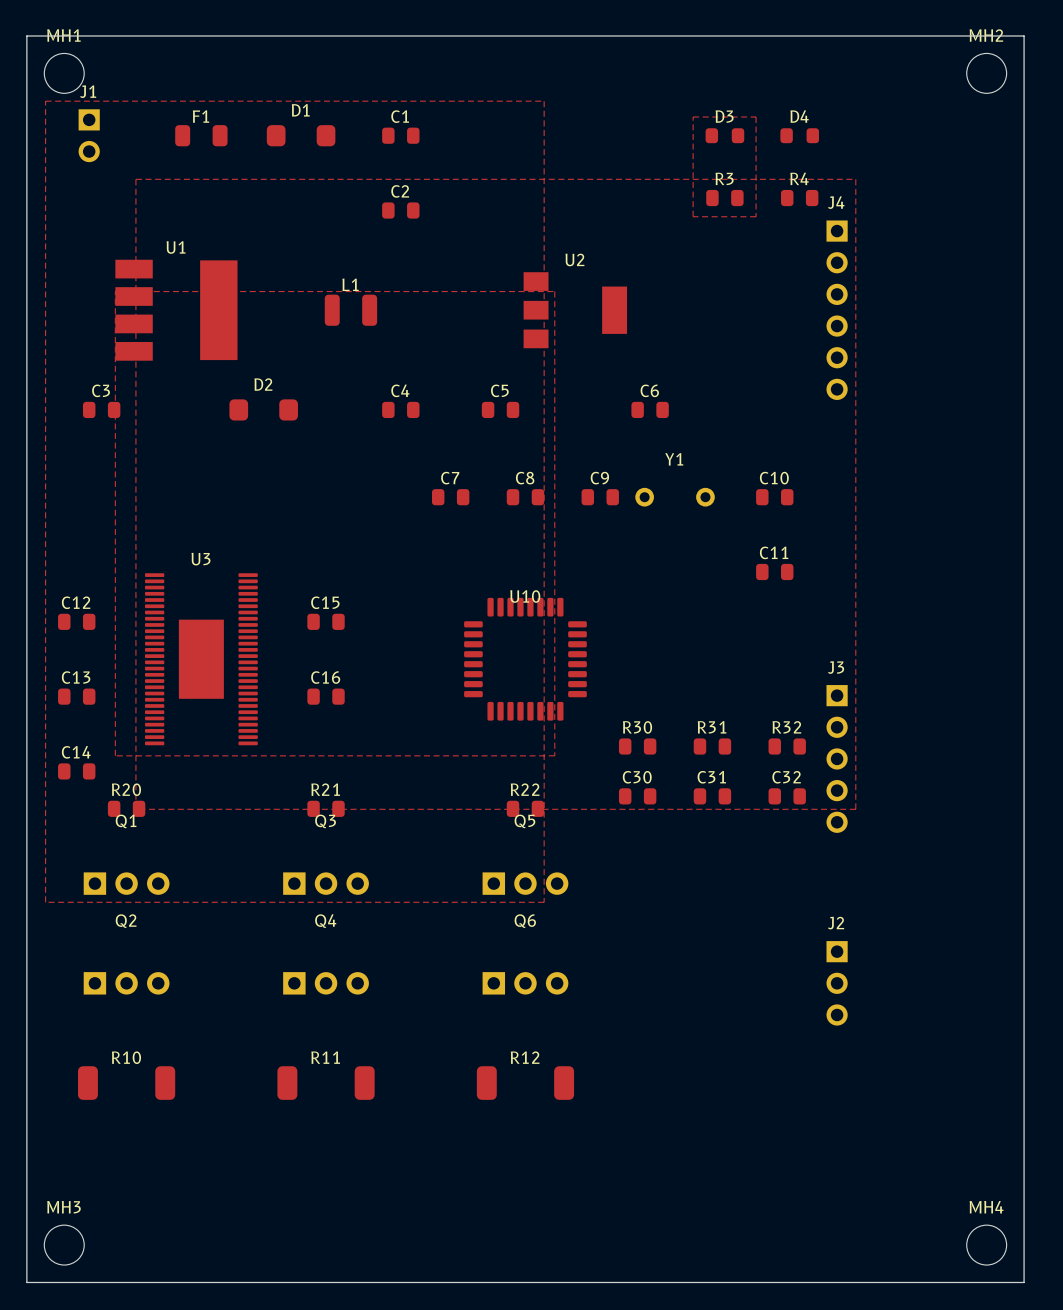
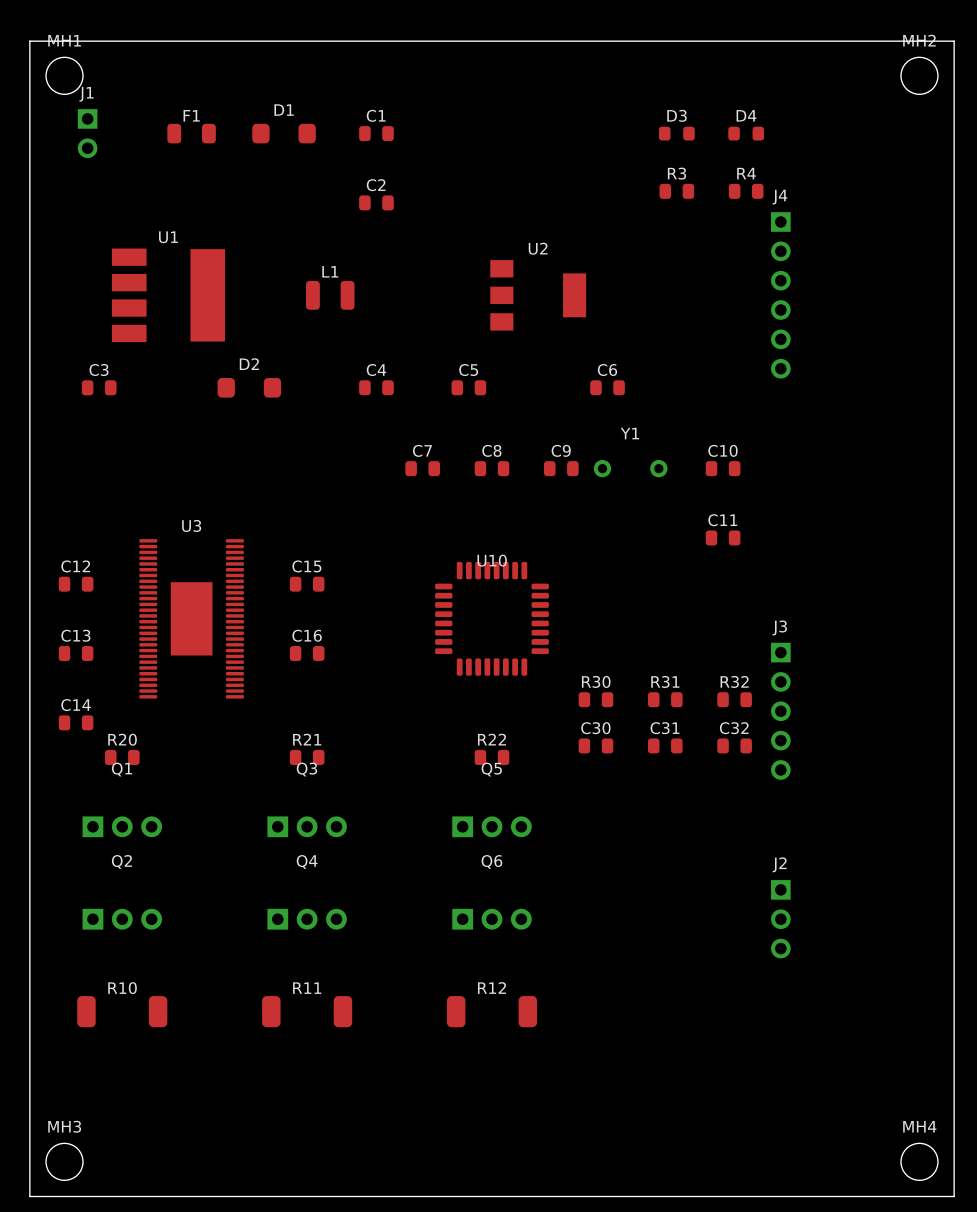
zone outline: (45, 101) (544, 101) (544, 902) (45, 902) (45, 101) -> none
zone outline: (693, 117) (756, 117) (756, 216) (693, 216) (693, 117) -> none
zone outline: (135, 179) (855, 179) (855, 809) (135, 809) (135, 179) -> none
zone outline: (115, 291) (554, 291) (554, 755) (115, 755) (115, 291) -> none

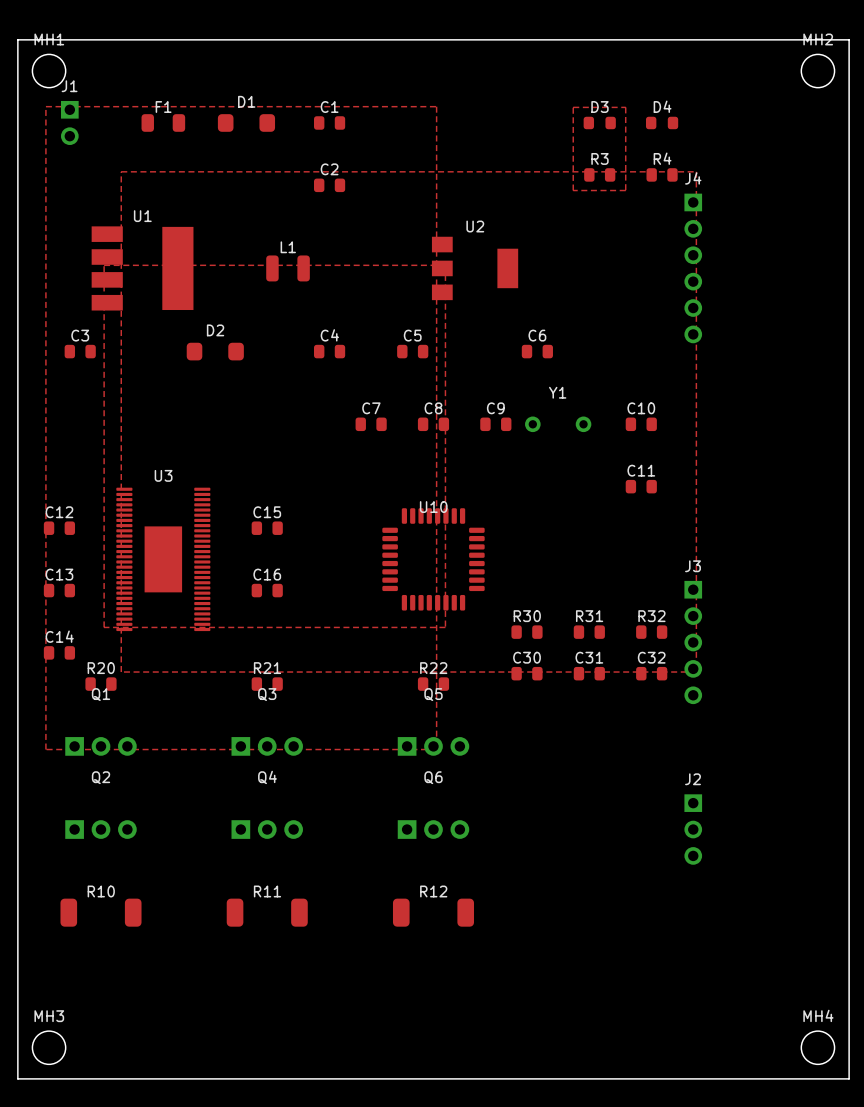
zone outline: none -> (45, 106) (436, 106) (436, 749) (45, 749) (45, 106)
zone outline: none -> (573, 107) (625, 107) (625, 190) (573, 190) (573, 107)
zone outline: none -> (121, 171) (696, 171) (696, 672) (121, 672) (121, 171)
zone outline: none -> (104, 265) (445, 265) (445, 627) (104, 627) (104, 265)

